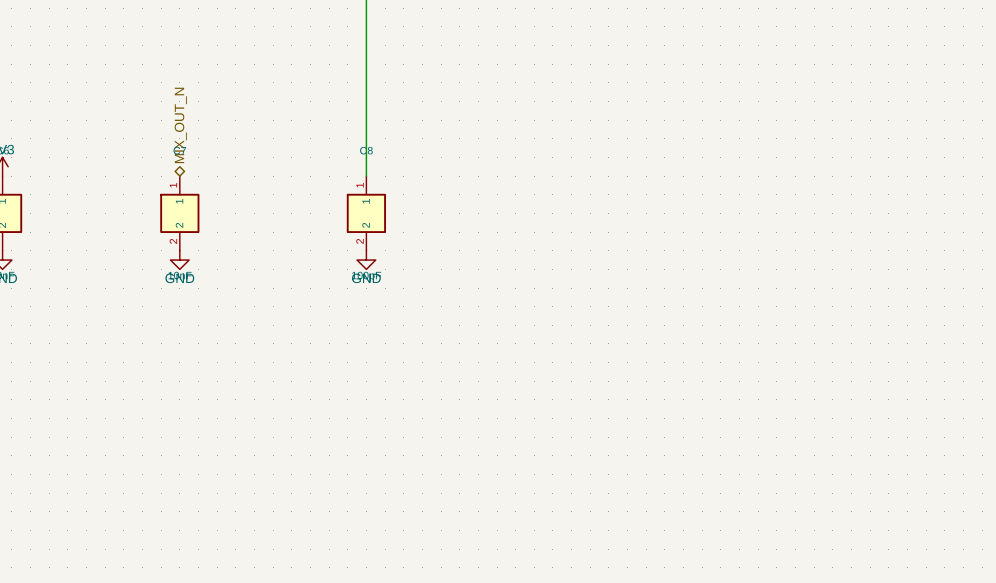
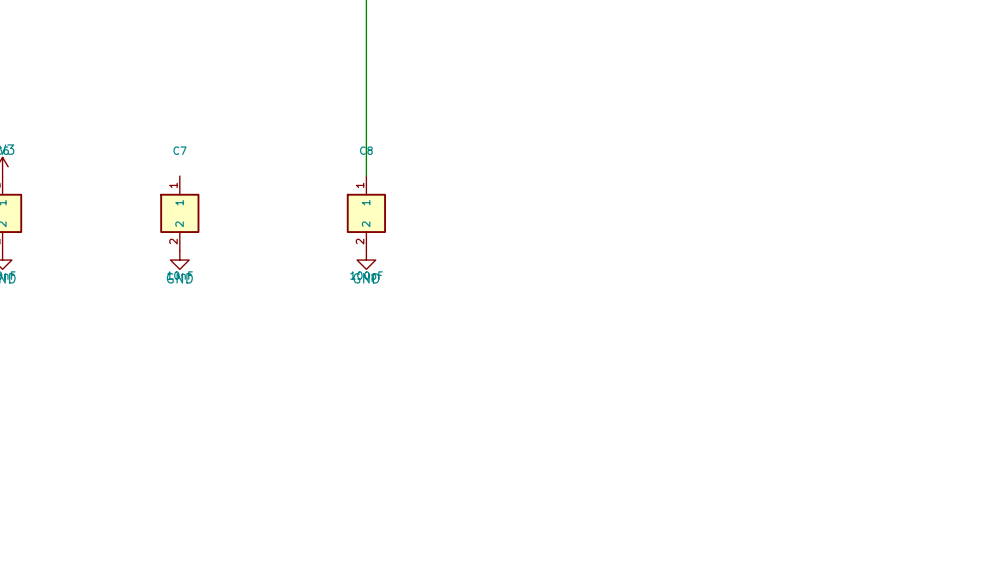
hierarchical label: MIX_OUT_N (180, 125) -> none

